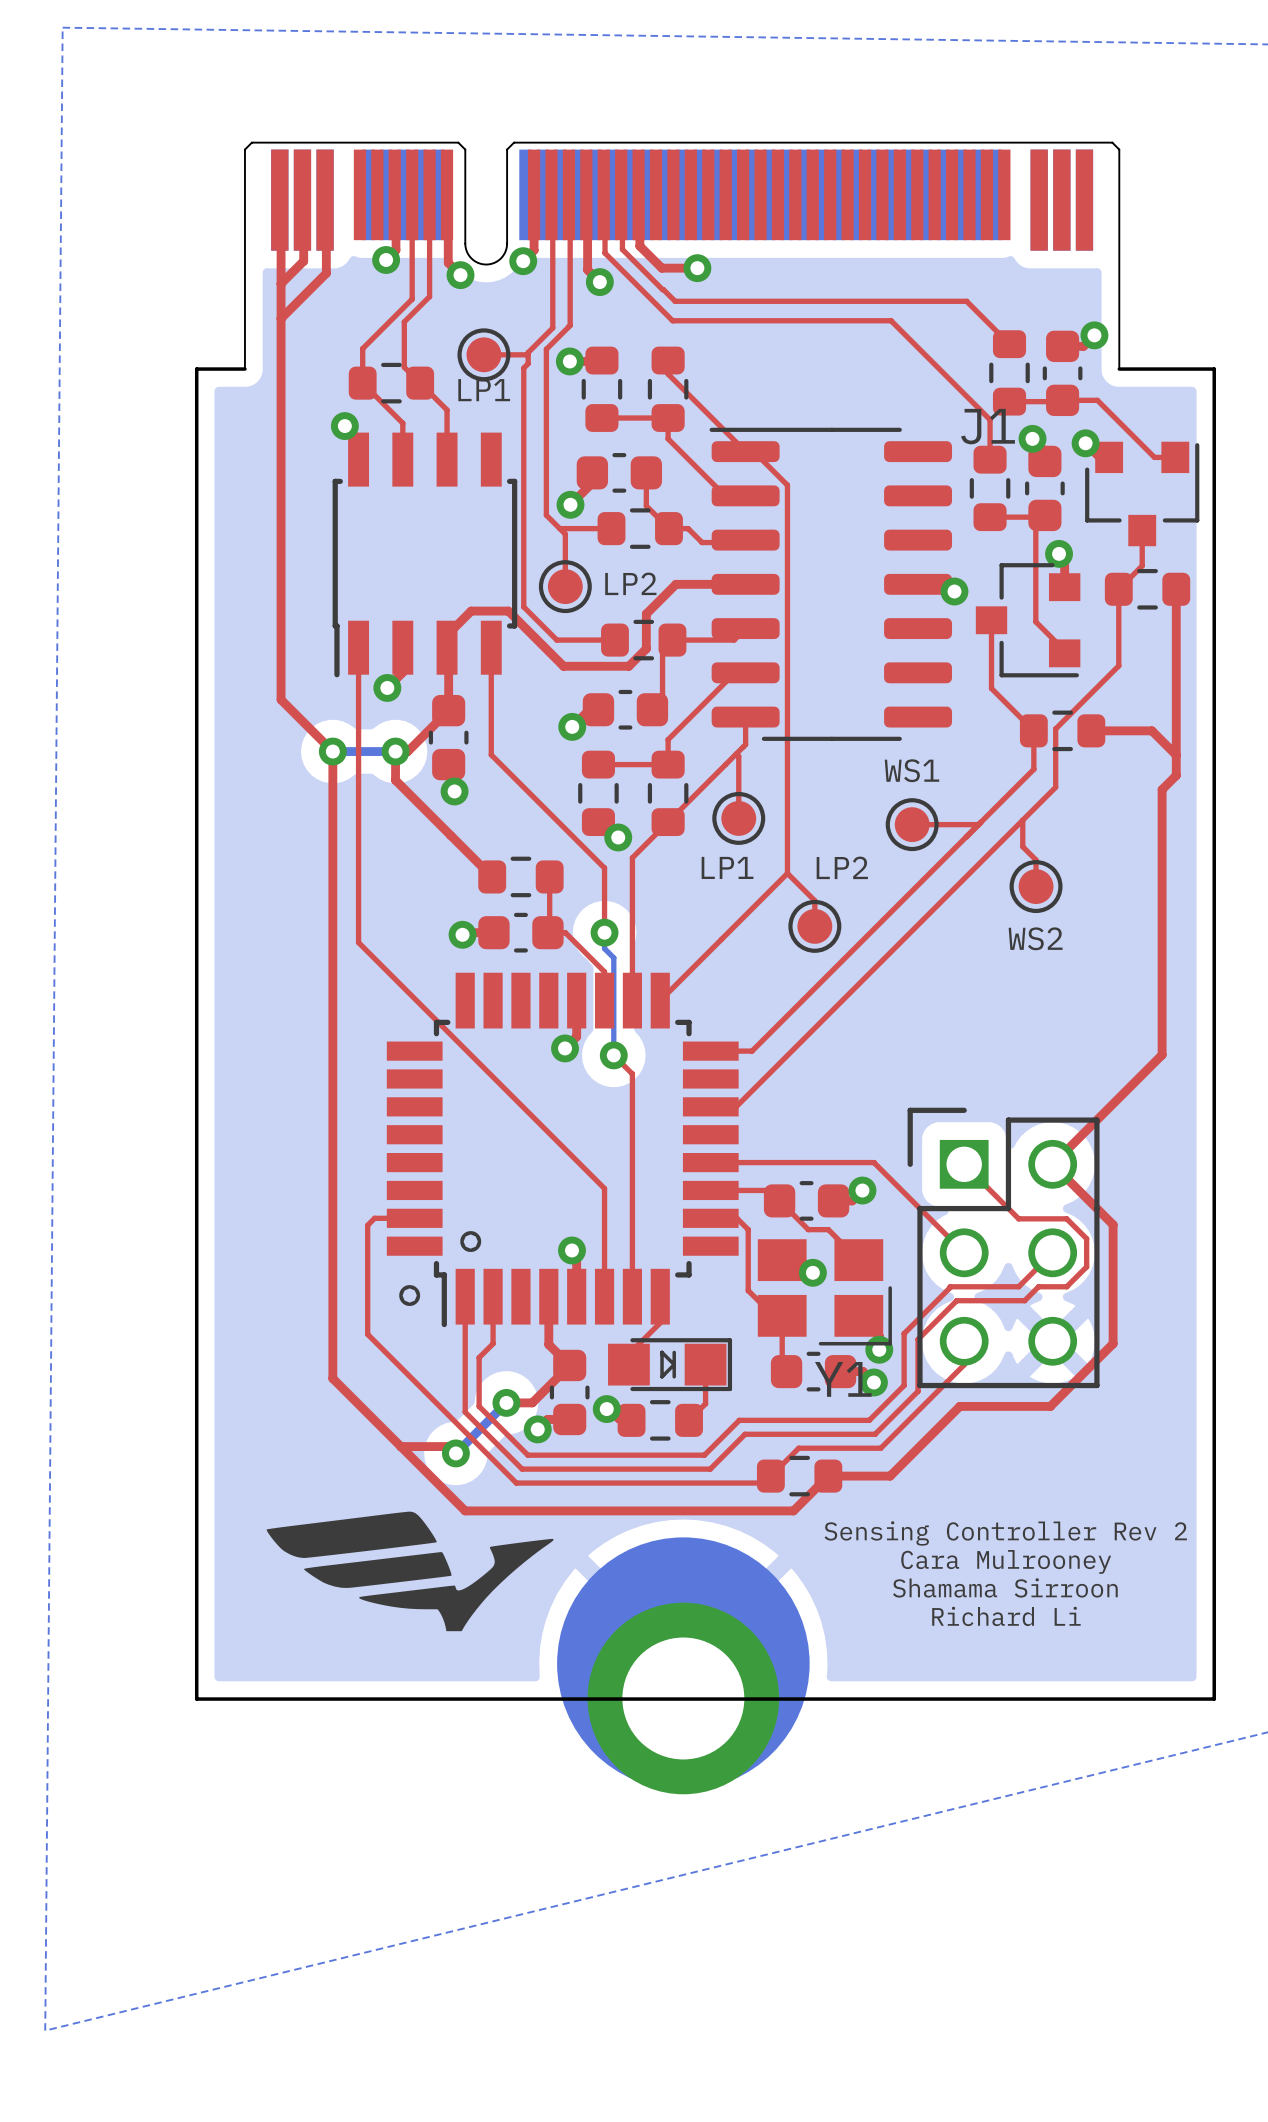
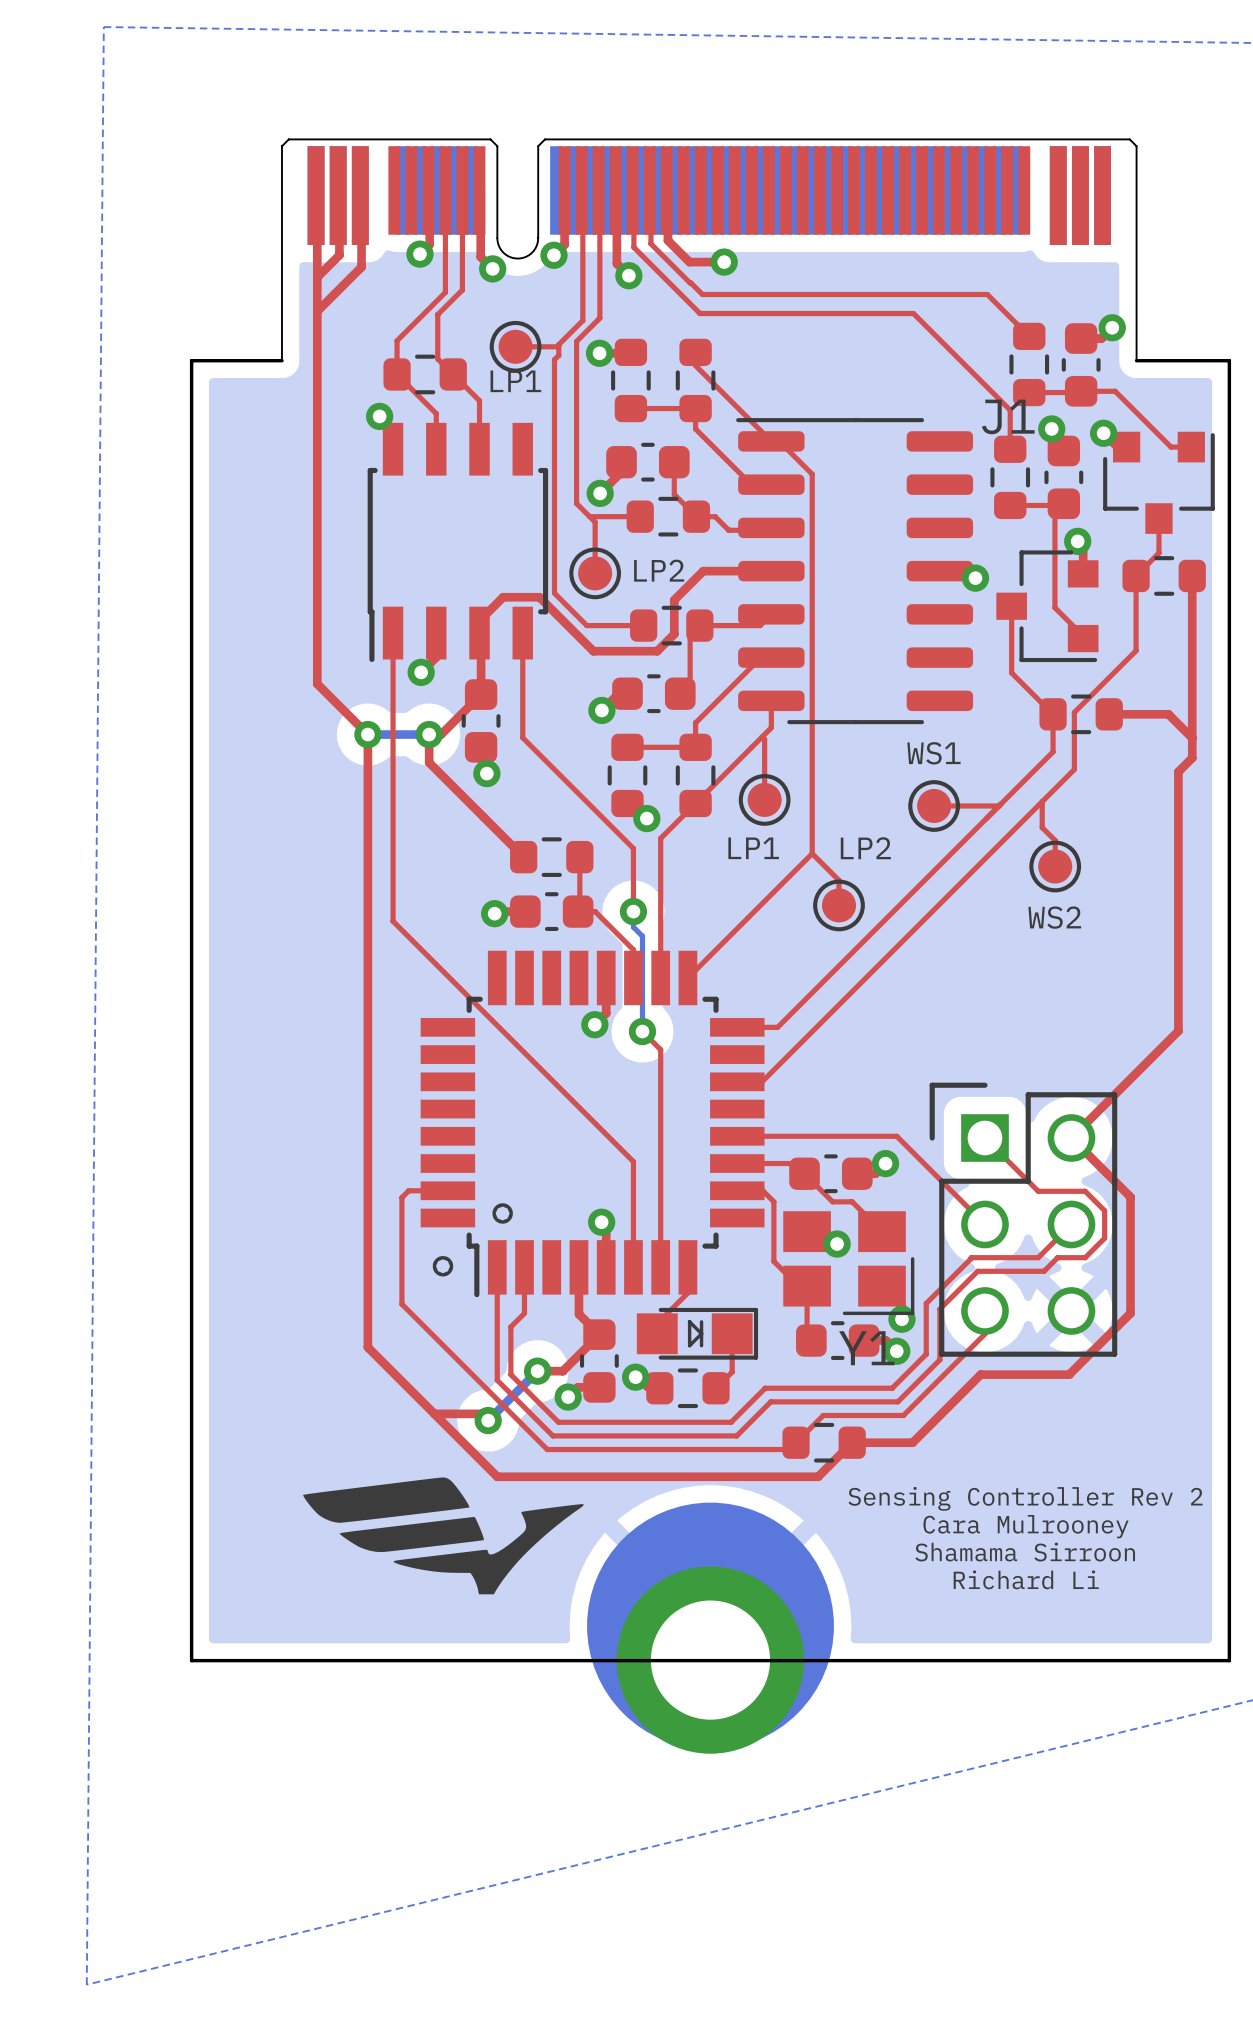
board edge: (196, 369) (196, 1699) -> (234, 360) (191, 360) (191, 1660) (234, 1660)

